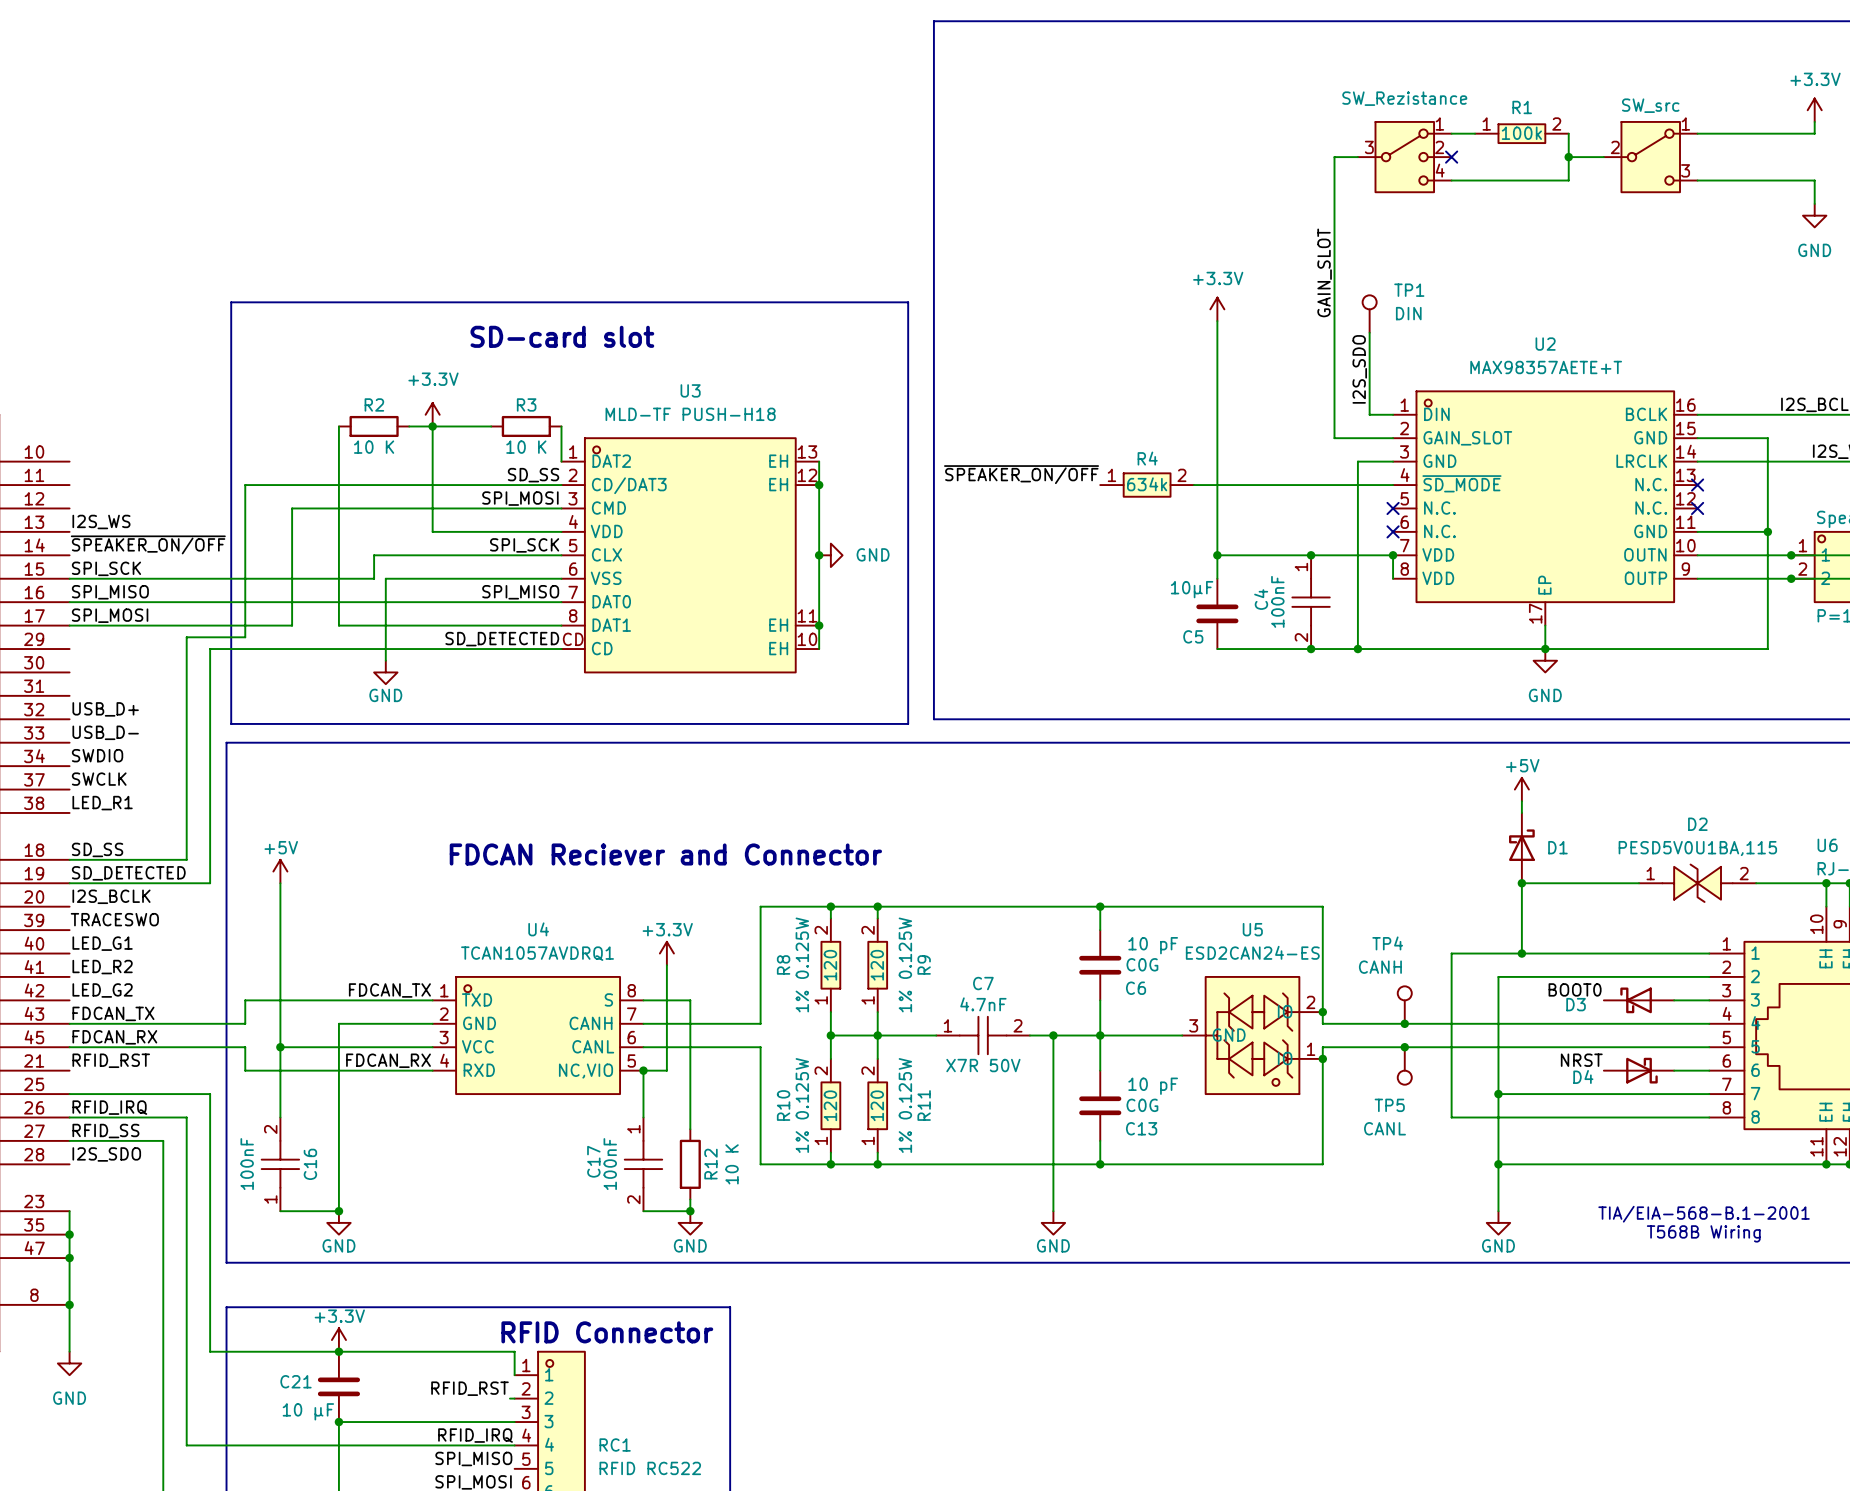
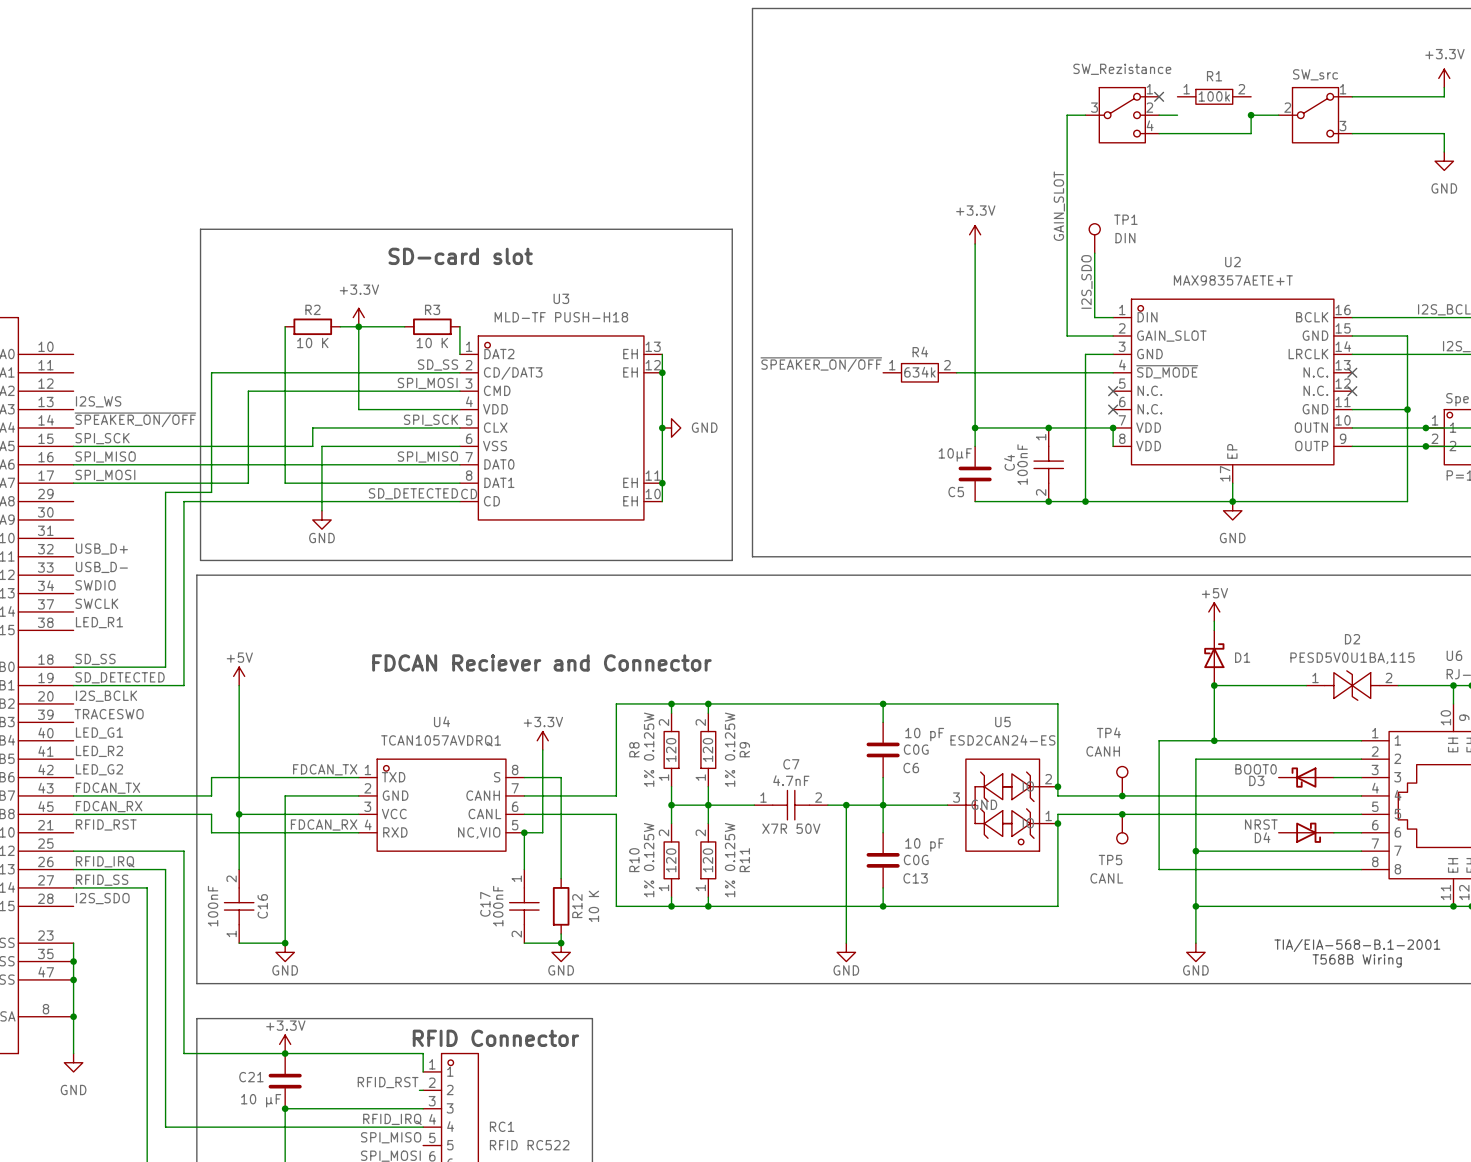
wire: (1451, 133) (1475, 133) -> (1159, 115) (1177, 115)
wire: (1568, 133) (1568, 157) -> none
no-connect mark position: (1451, 157) -> (1159, 96)

